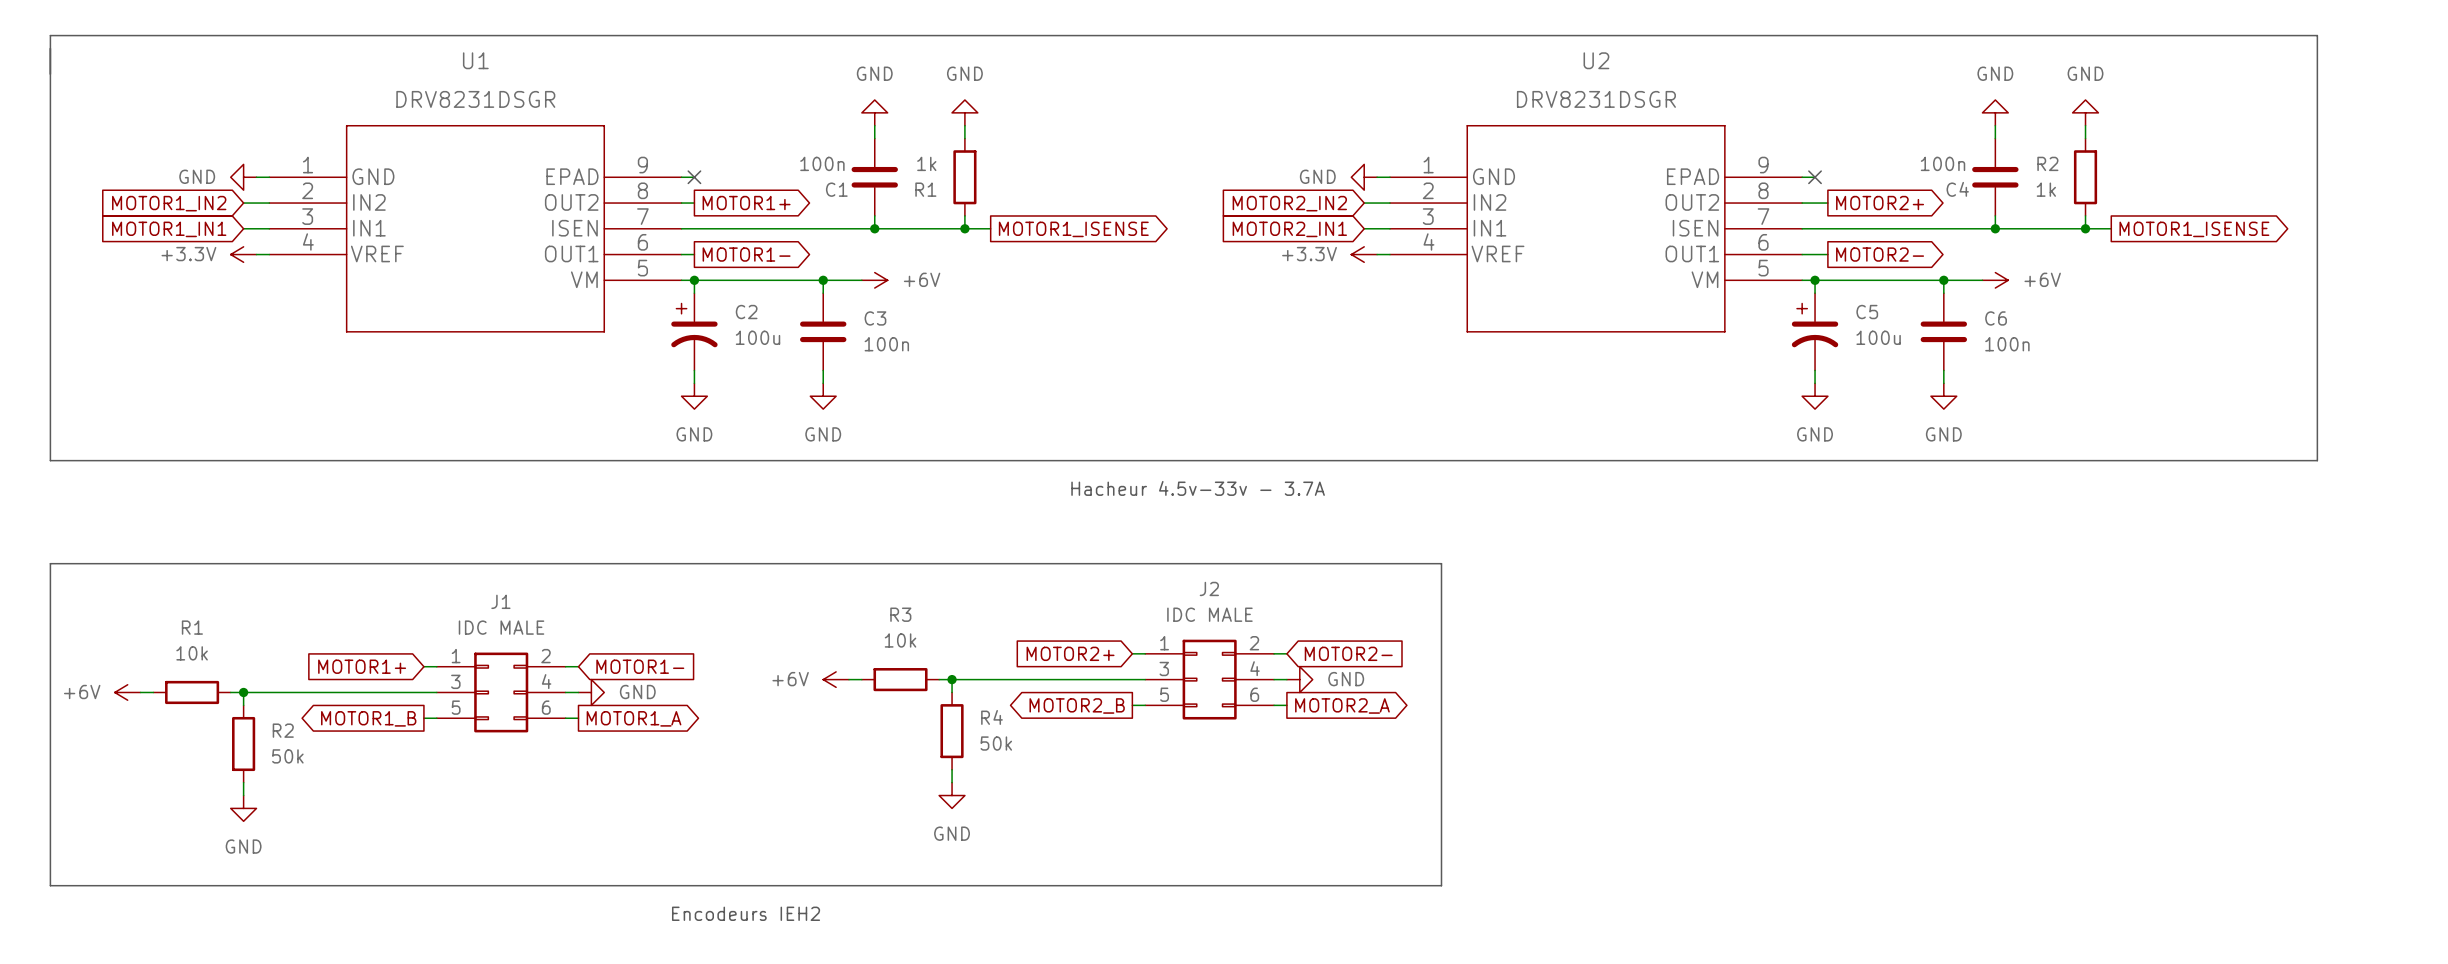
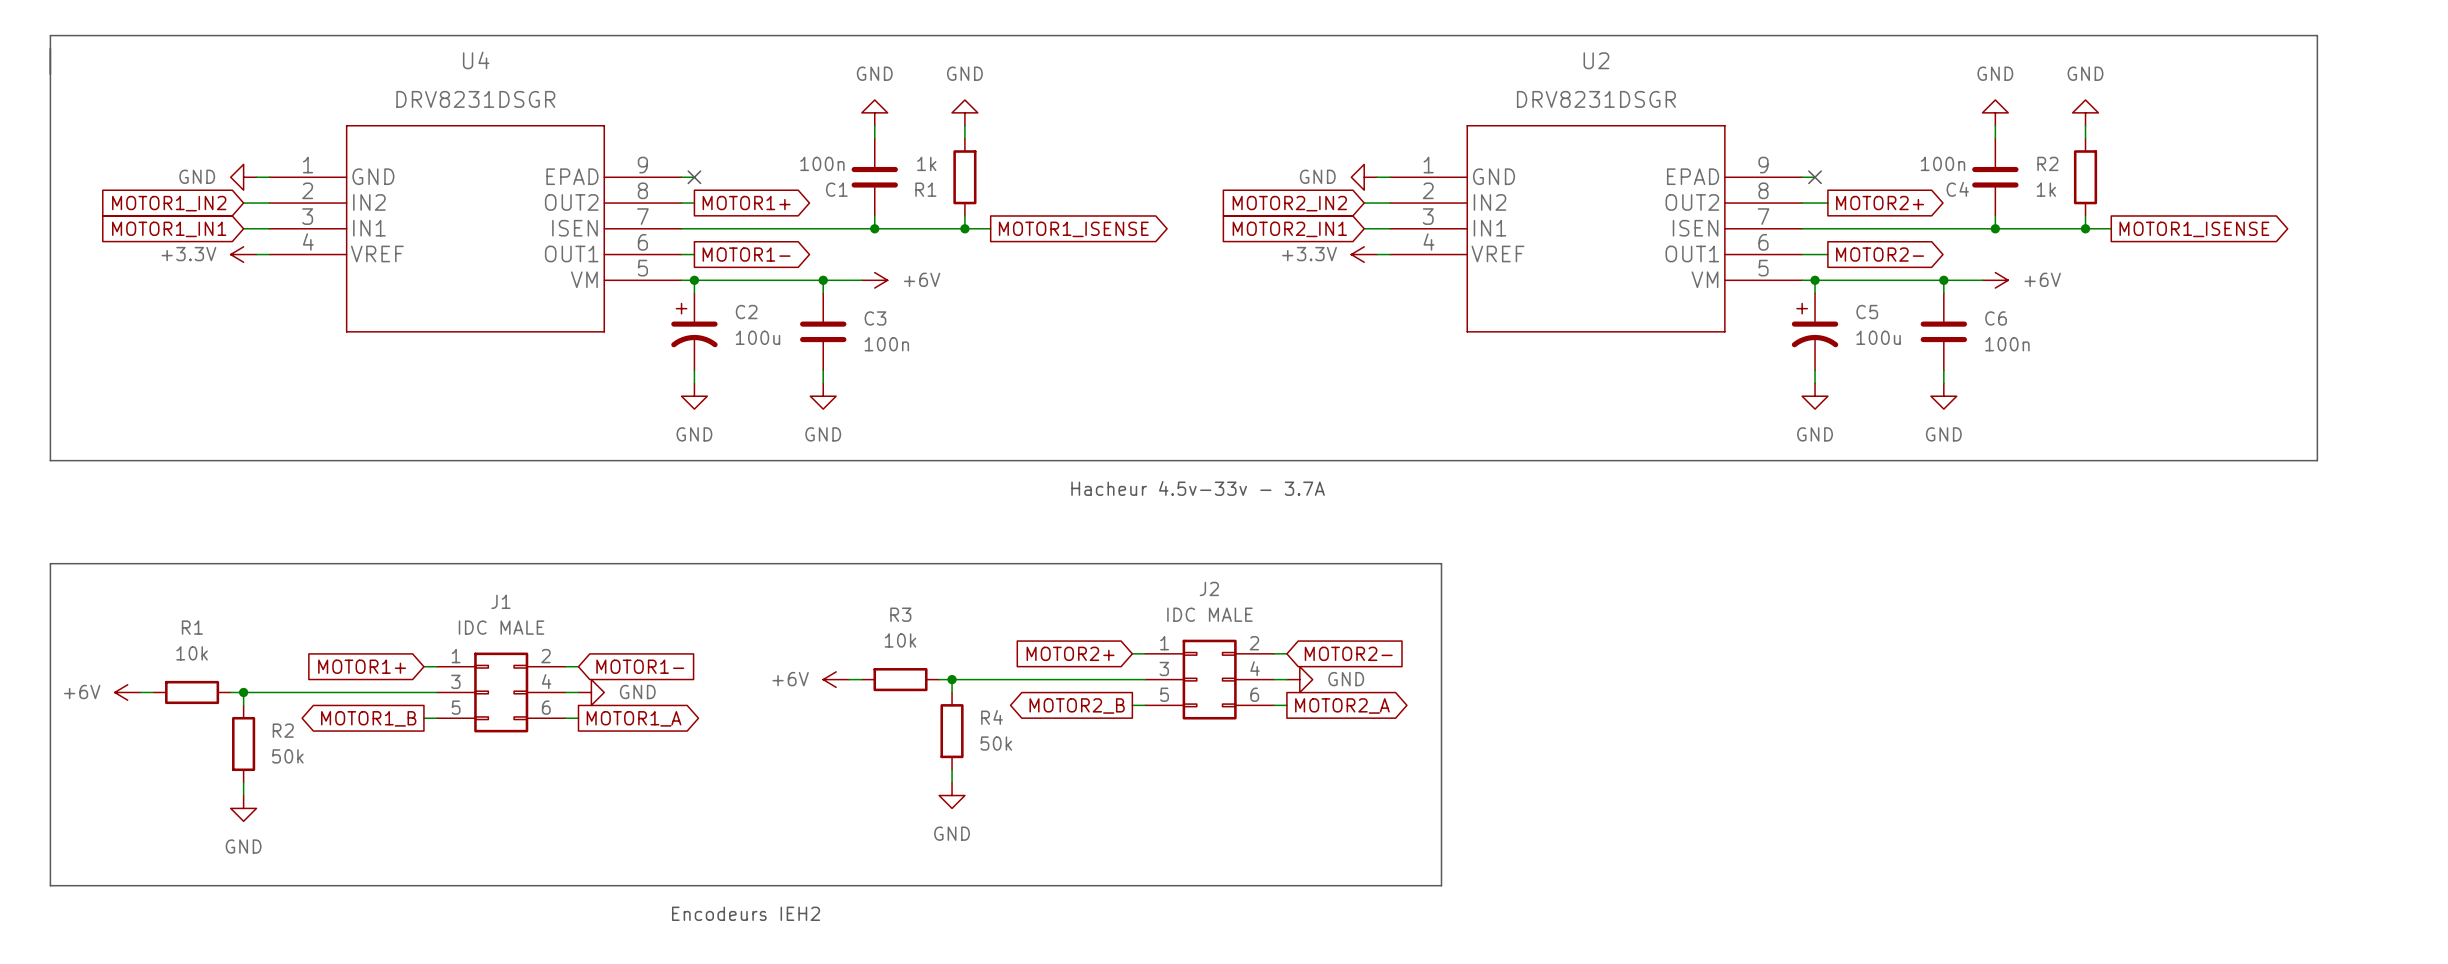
U1 name: U1 (475, 60) -> U4 (476, 60)

